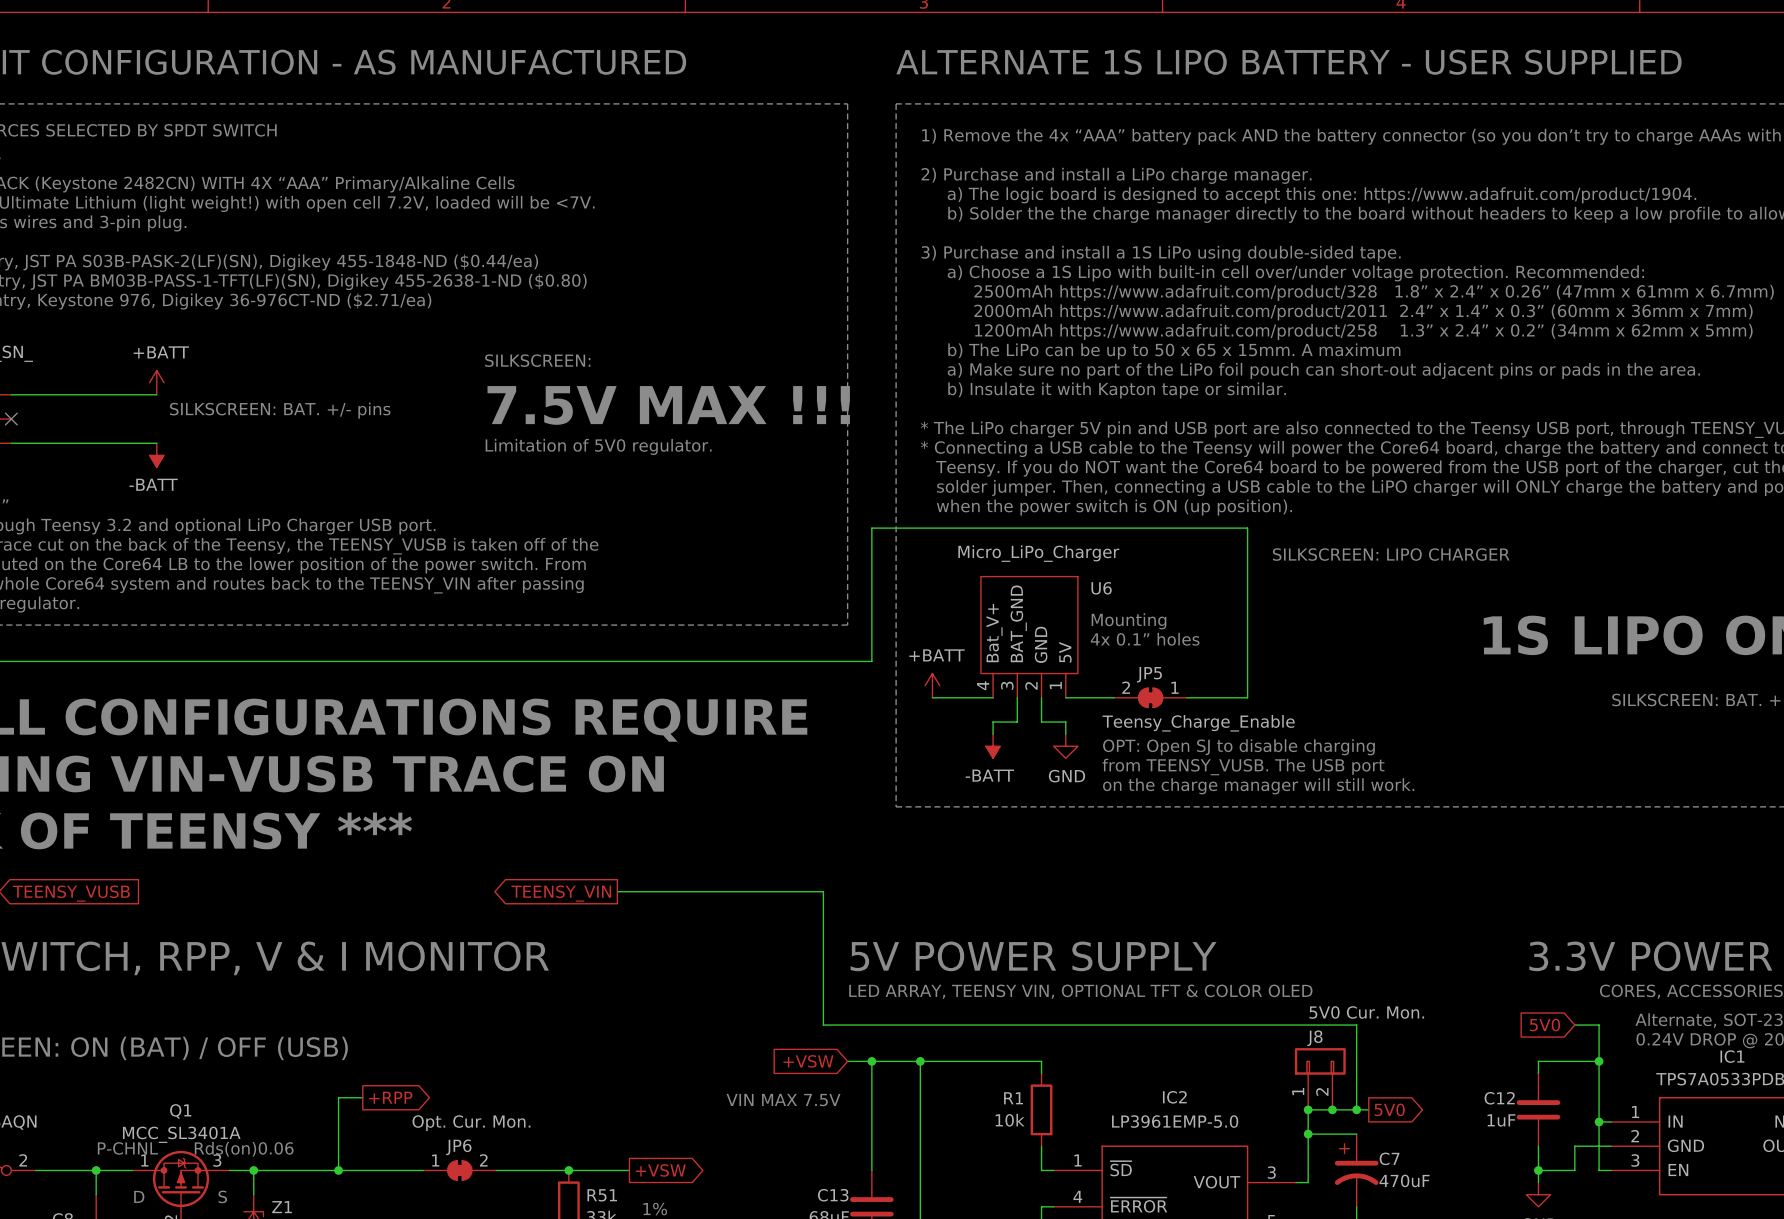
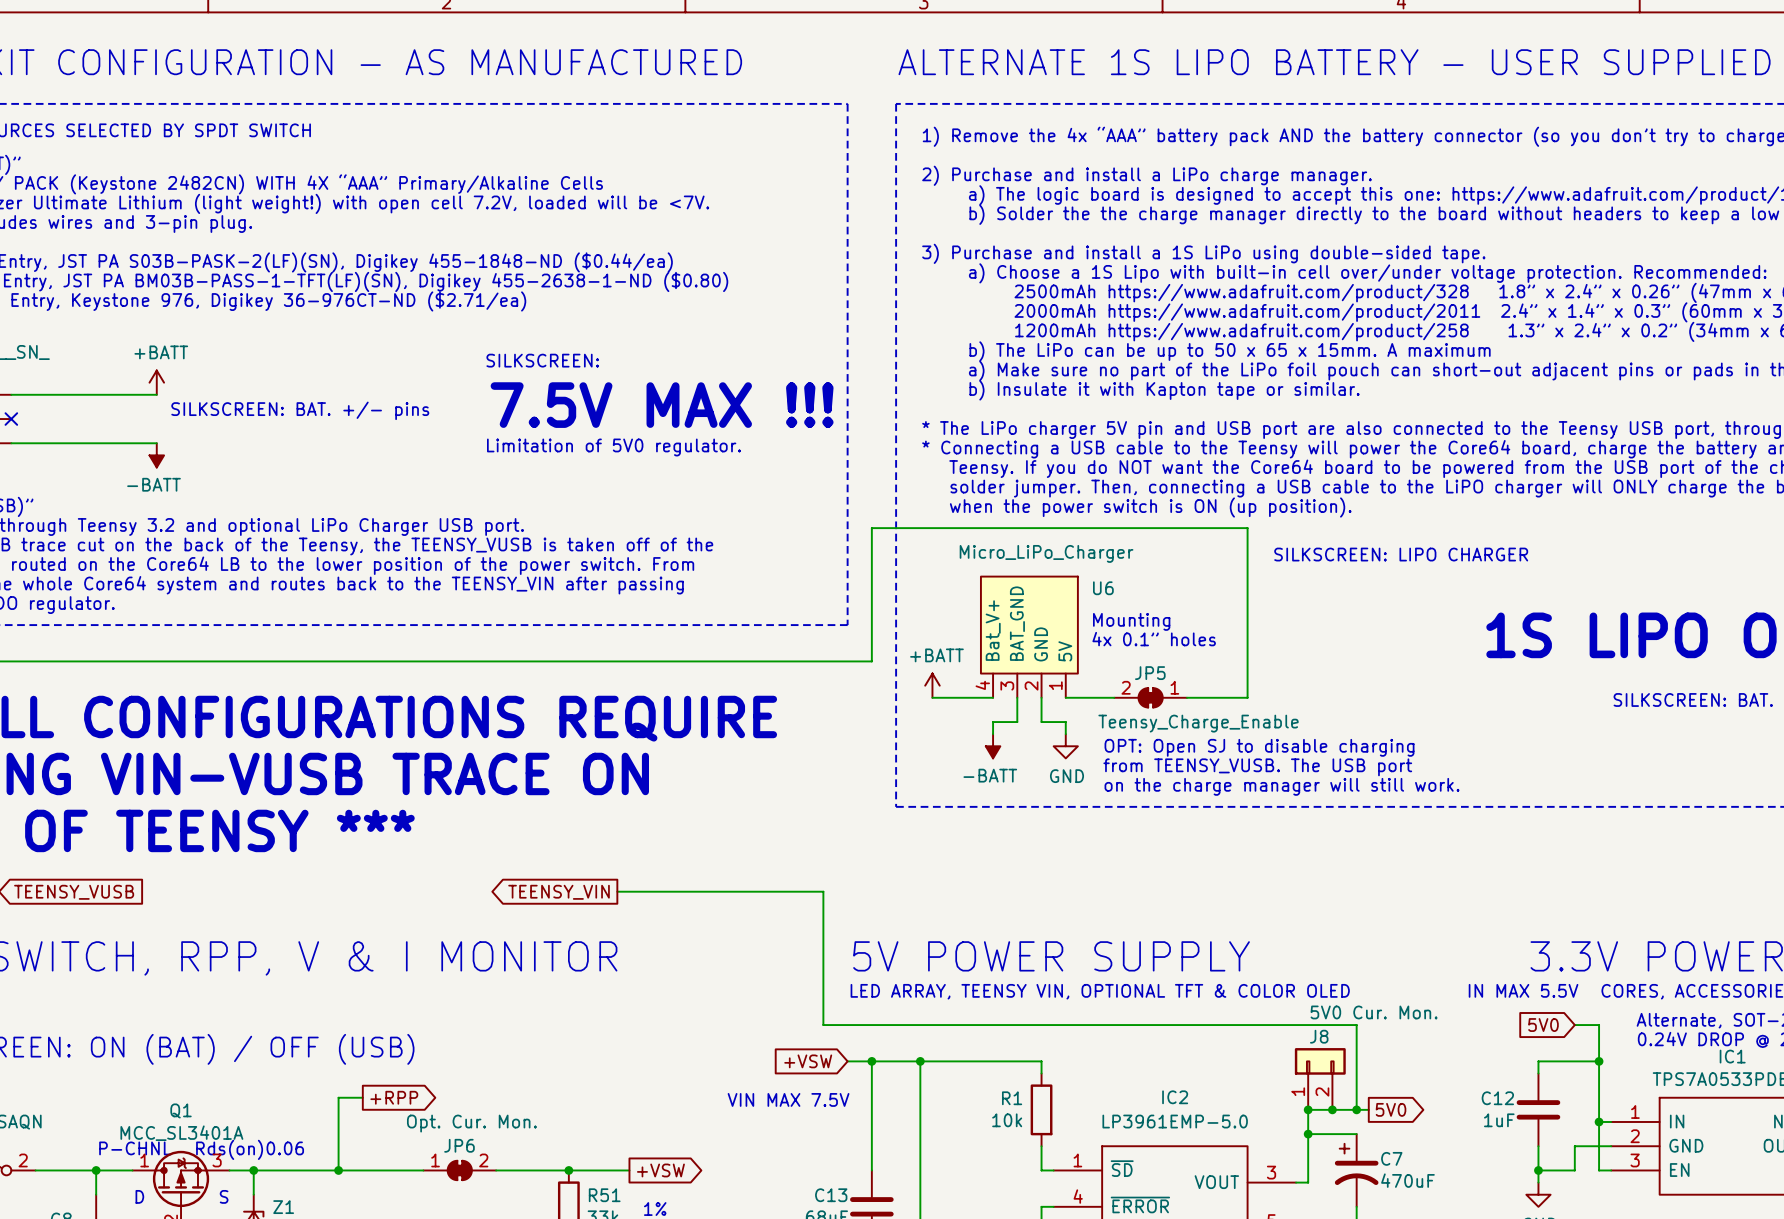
text: none -> IN MAX 5.5V (1523, 990)

